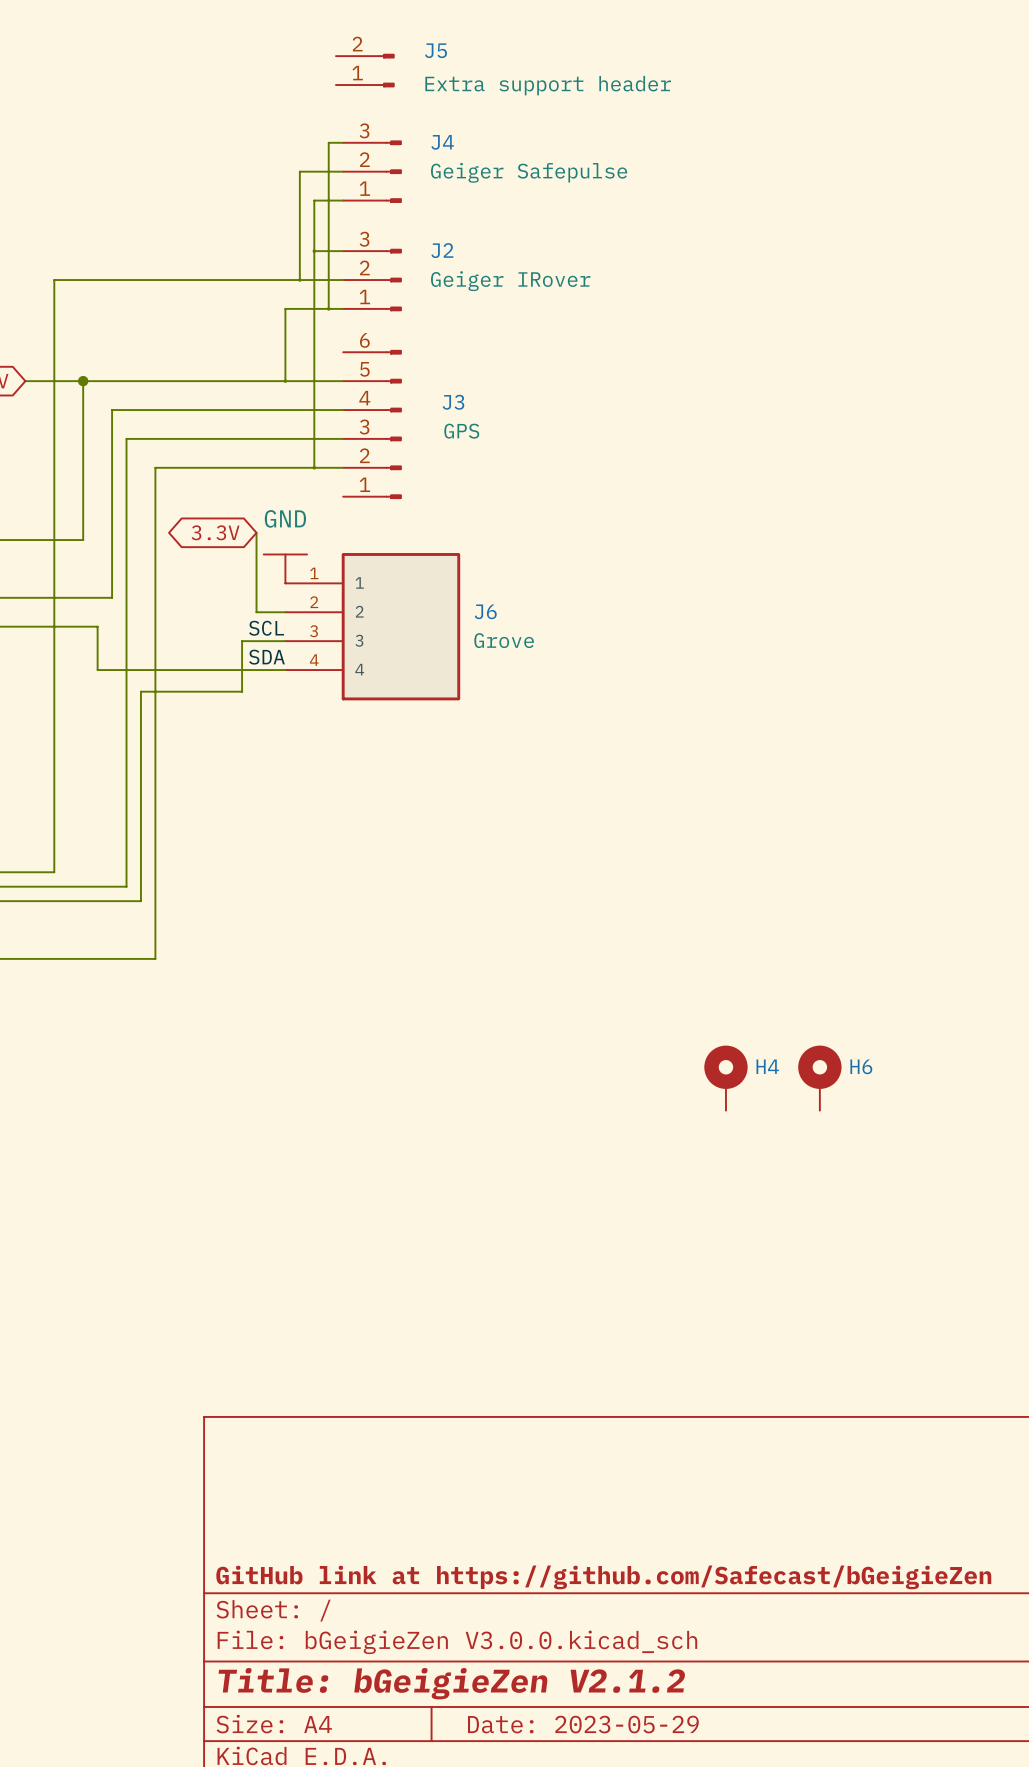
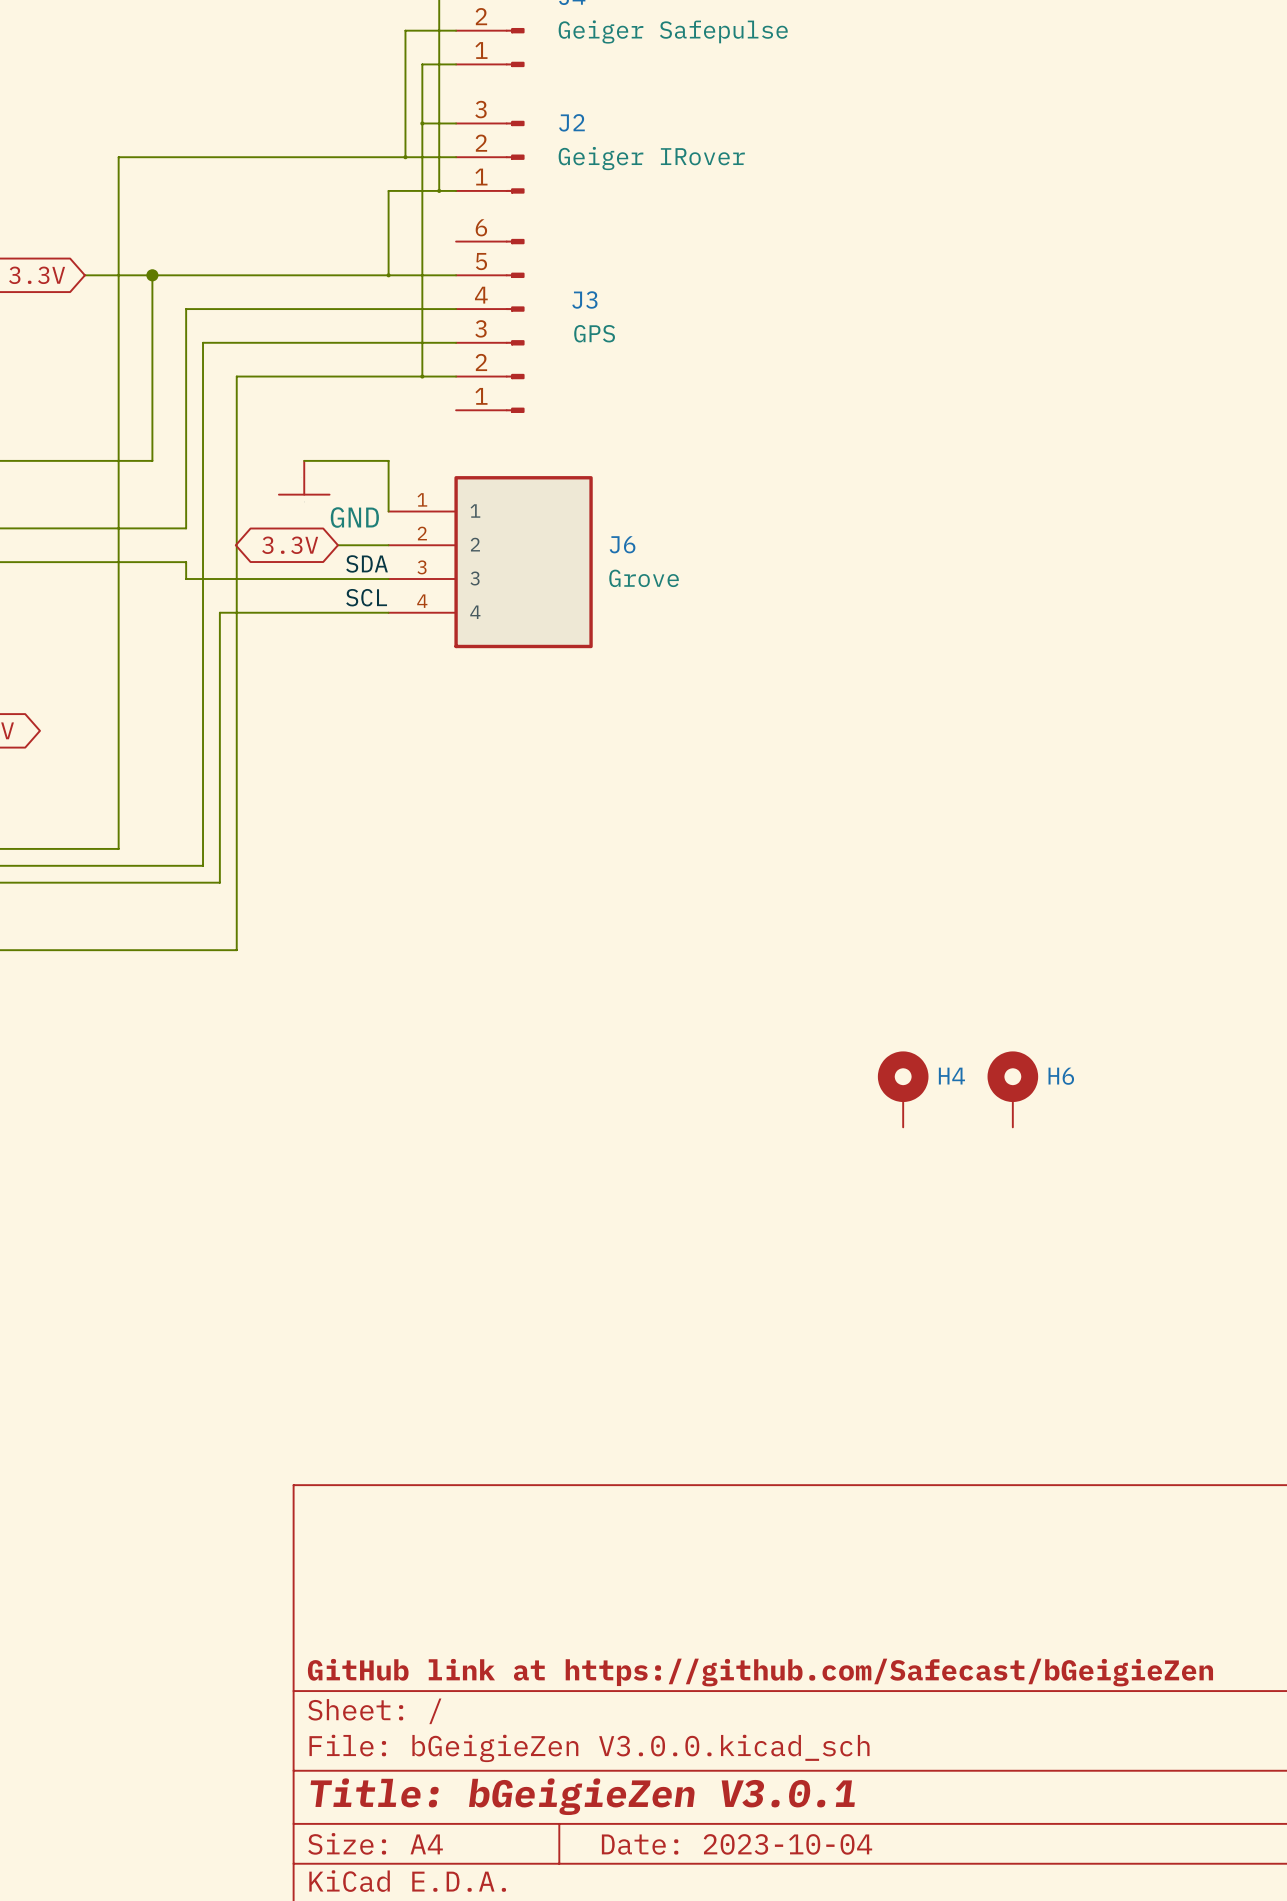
power symbol text position: GND (285, 518) -> GND (354, 517)
global label position: 3.3V (215, 532) -> 3.3V (290, 545)
wire: (256, 532) (256, 612) -> (337, 545) (354, 545)
wire: none -> (304, 460) (388, 460) (388, 511)
power symbol rotation: 0° (285, 554) -> 180° (304, 494)
power symbol position: GND (285, 568) -> GND (304, 477)
wire: (97, 626) (97, 670) (140, 670) -> (219, 638) (219, 612)
label: SCL (266, 628) -> SDA (367, 563)
wire: (242, 641) (242, 691) (140, 691) -> (337, 579) (186, 579) (186, 562) (169, 562)
label: SDA (266, 657) -> SCL (366, 597)
title block: Title: bGeigieZen V2.1.2 (451, 1683) -> Title: bGeigieZen V3.0.1 (582, 1796)
title block: Date: 2023-05-29 (583, 1724) -> Date: 2023-10-04 (737, 1844)

